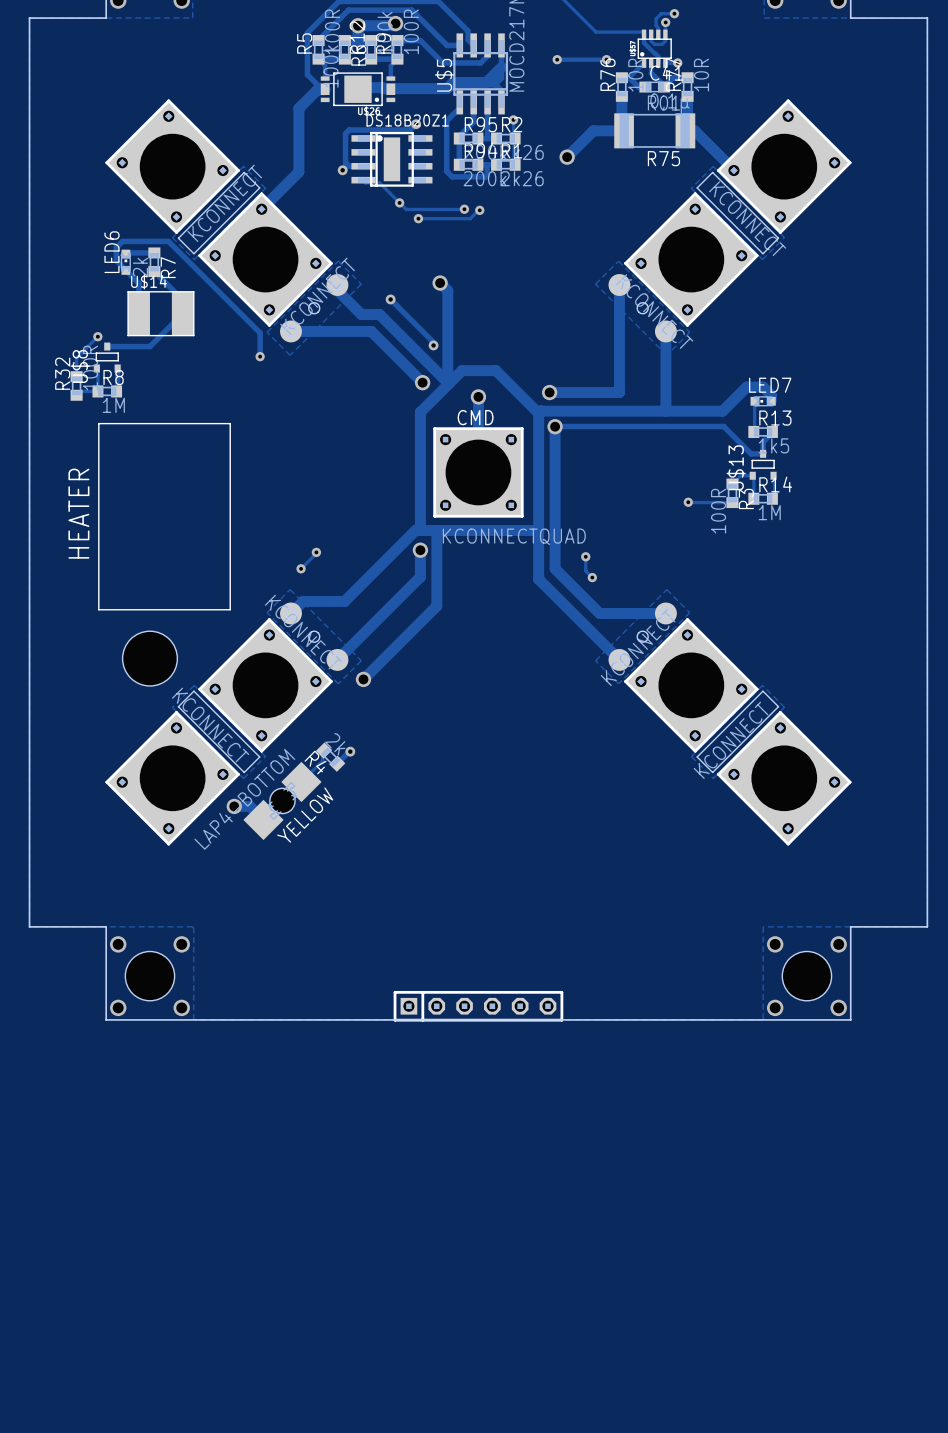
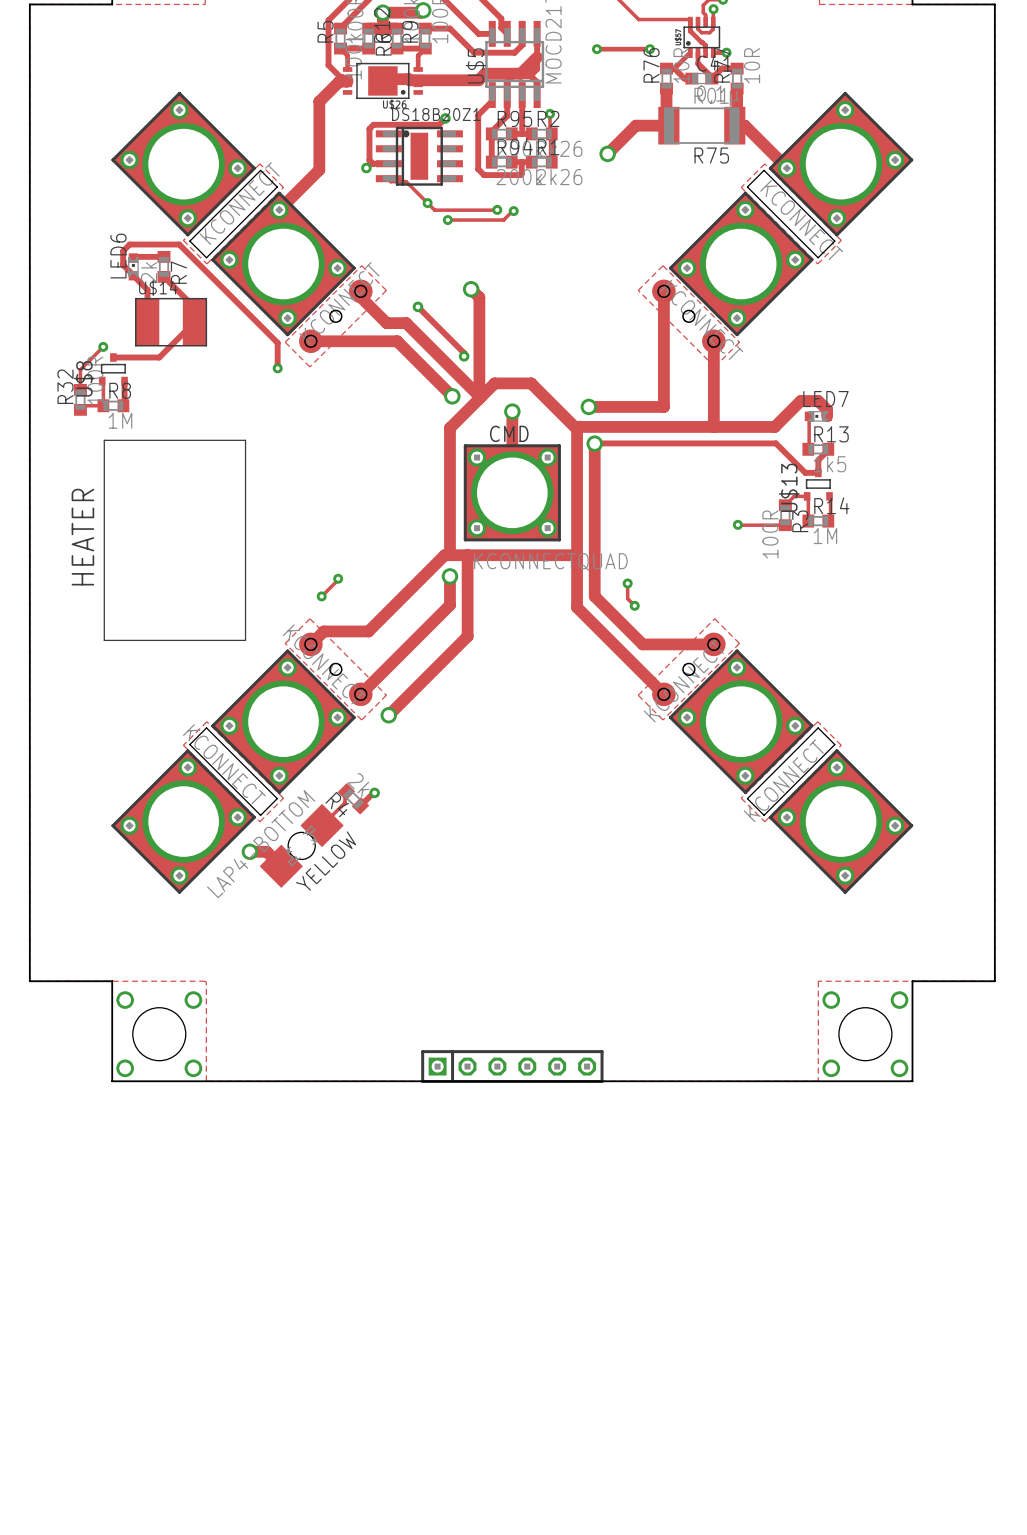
hole: (149, 658) -> none

